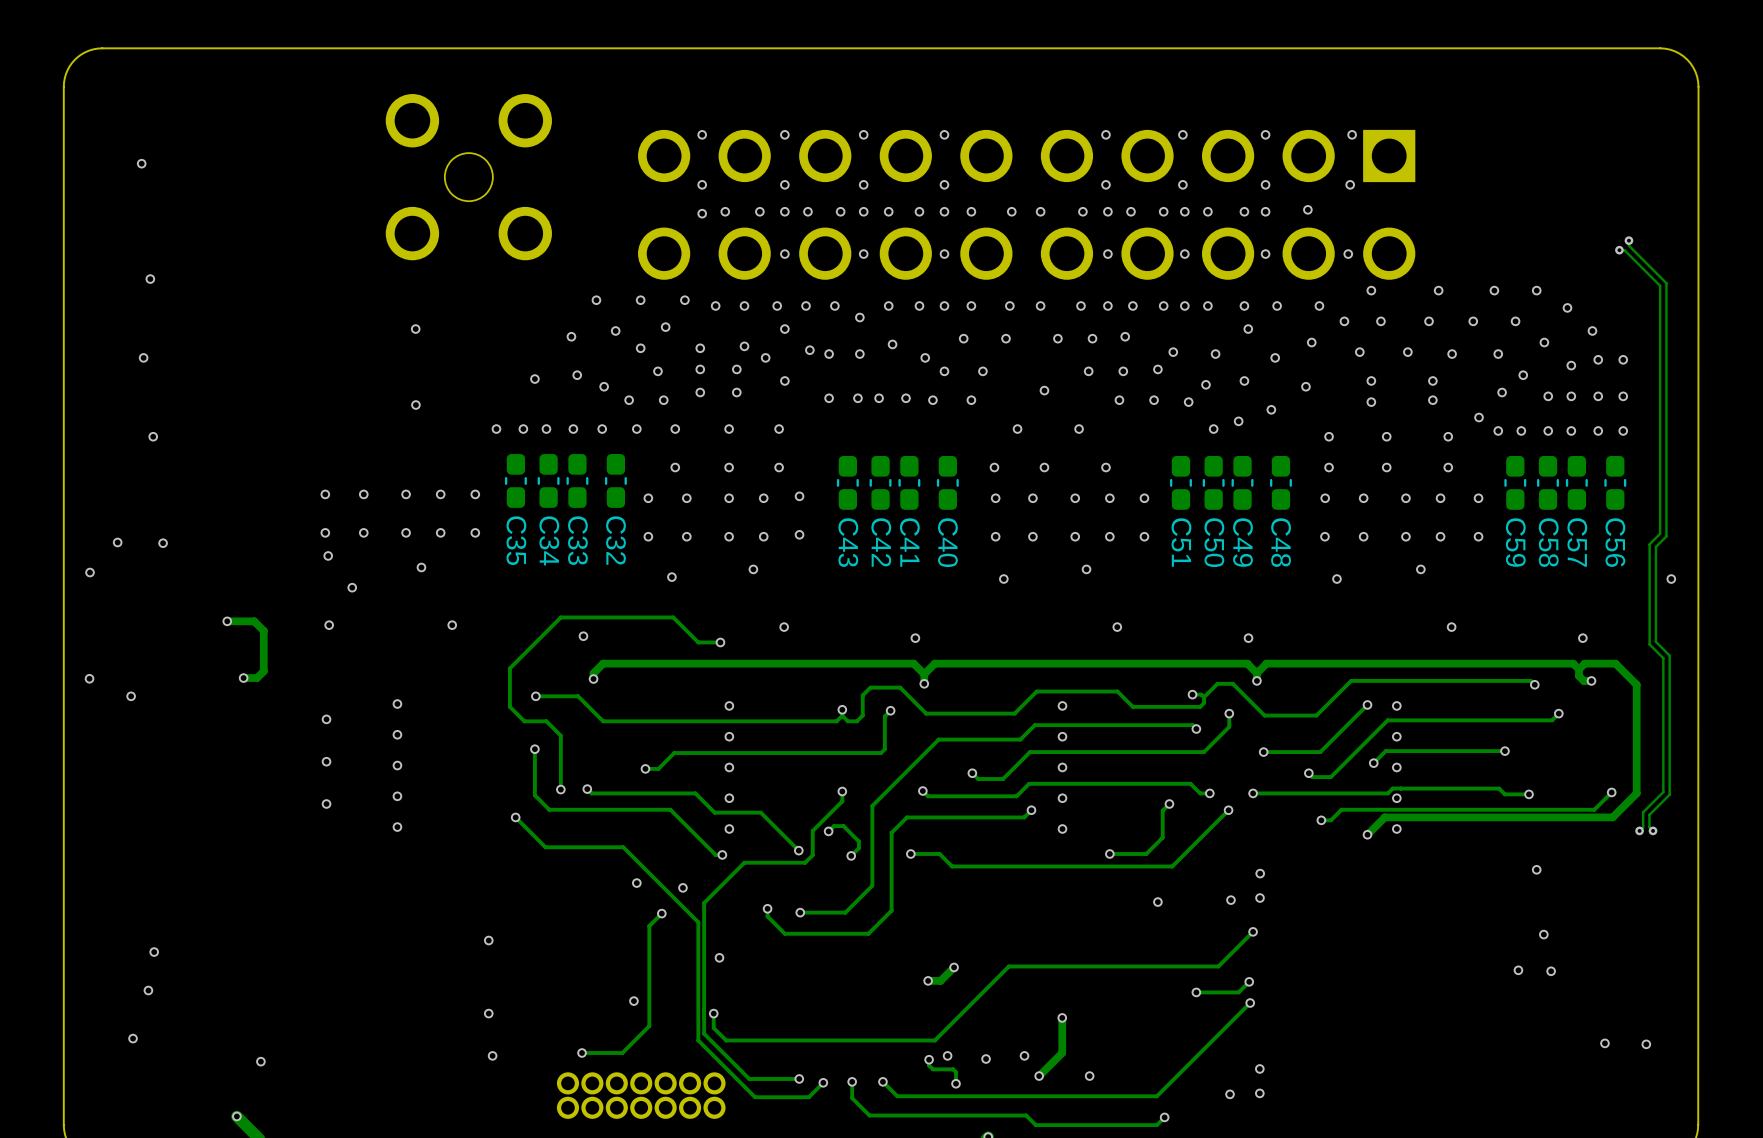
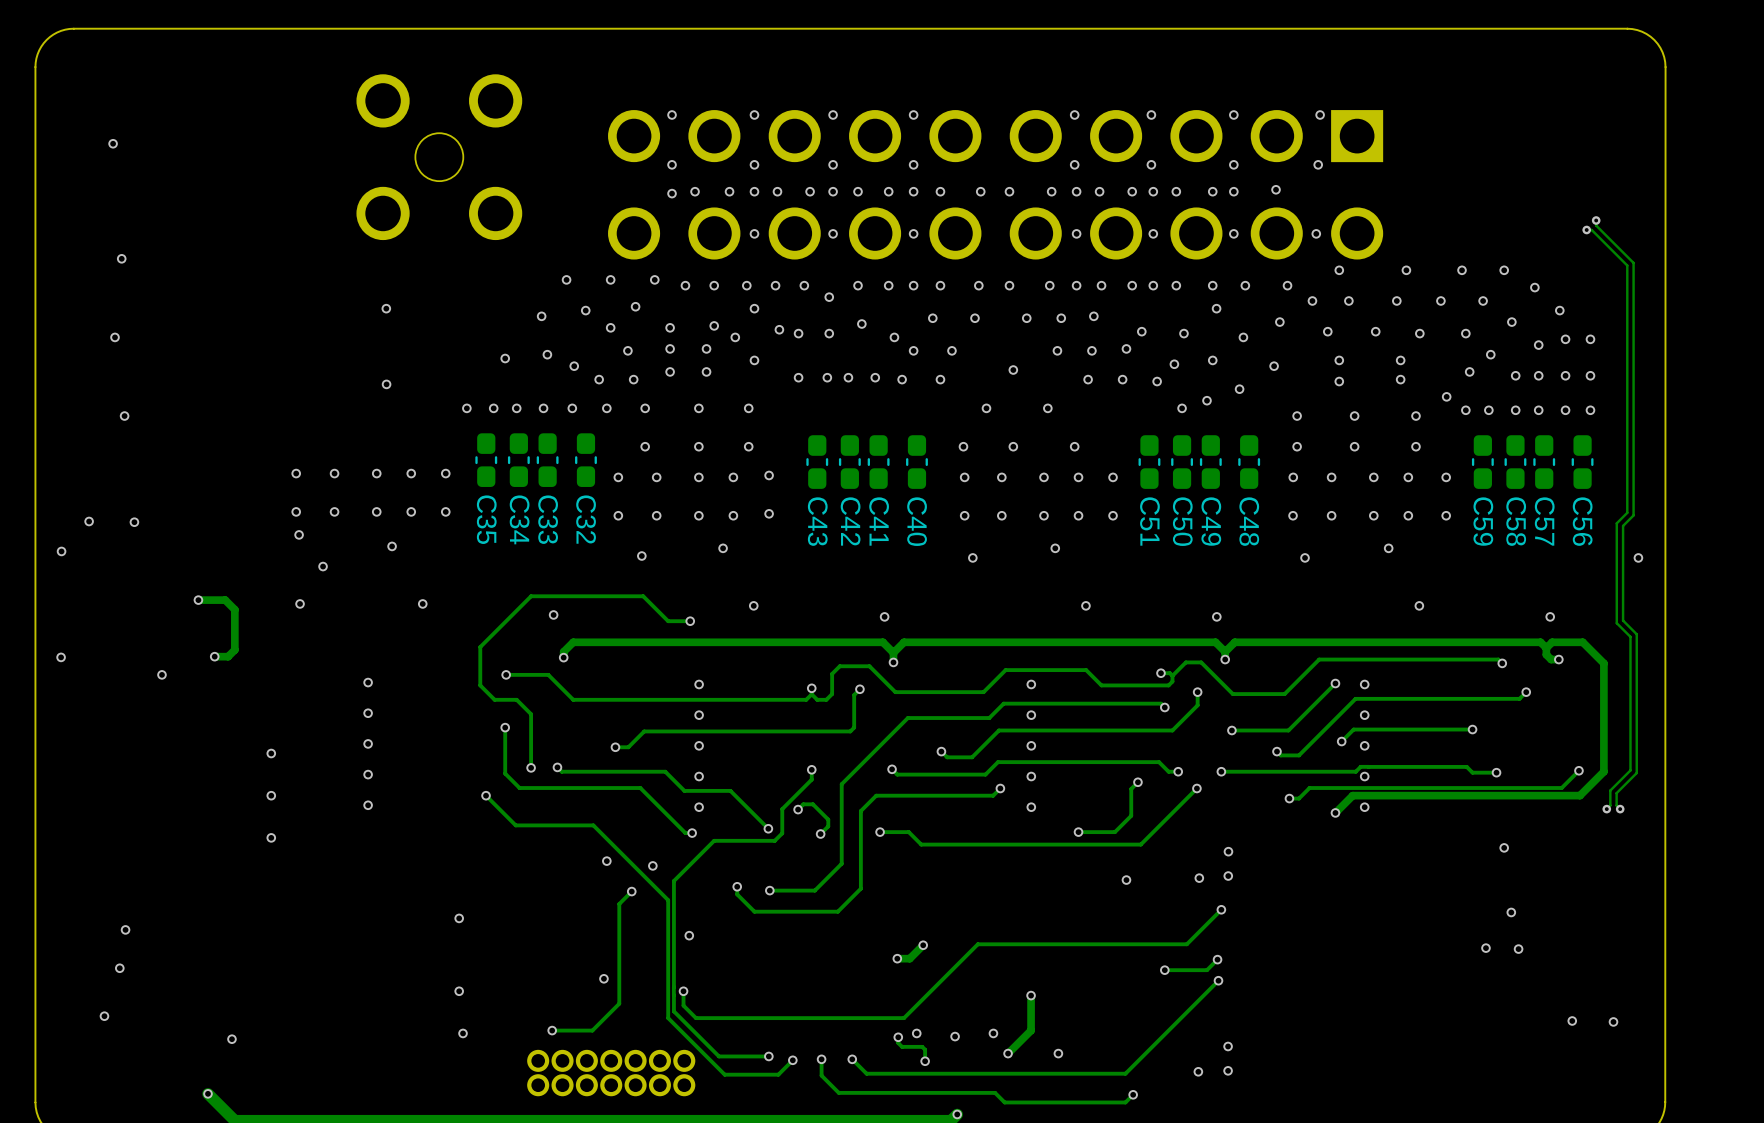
via position: (131, 696) -> (161, 674)
via: (326, 719) -> none
via: (326, 761) -> none
via: none -> (271, 753)
via: (326, 803) -> none
via: none -> (271, 795)
via: none -> (271, 837)

